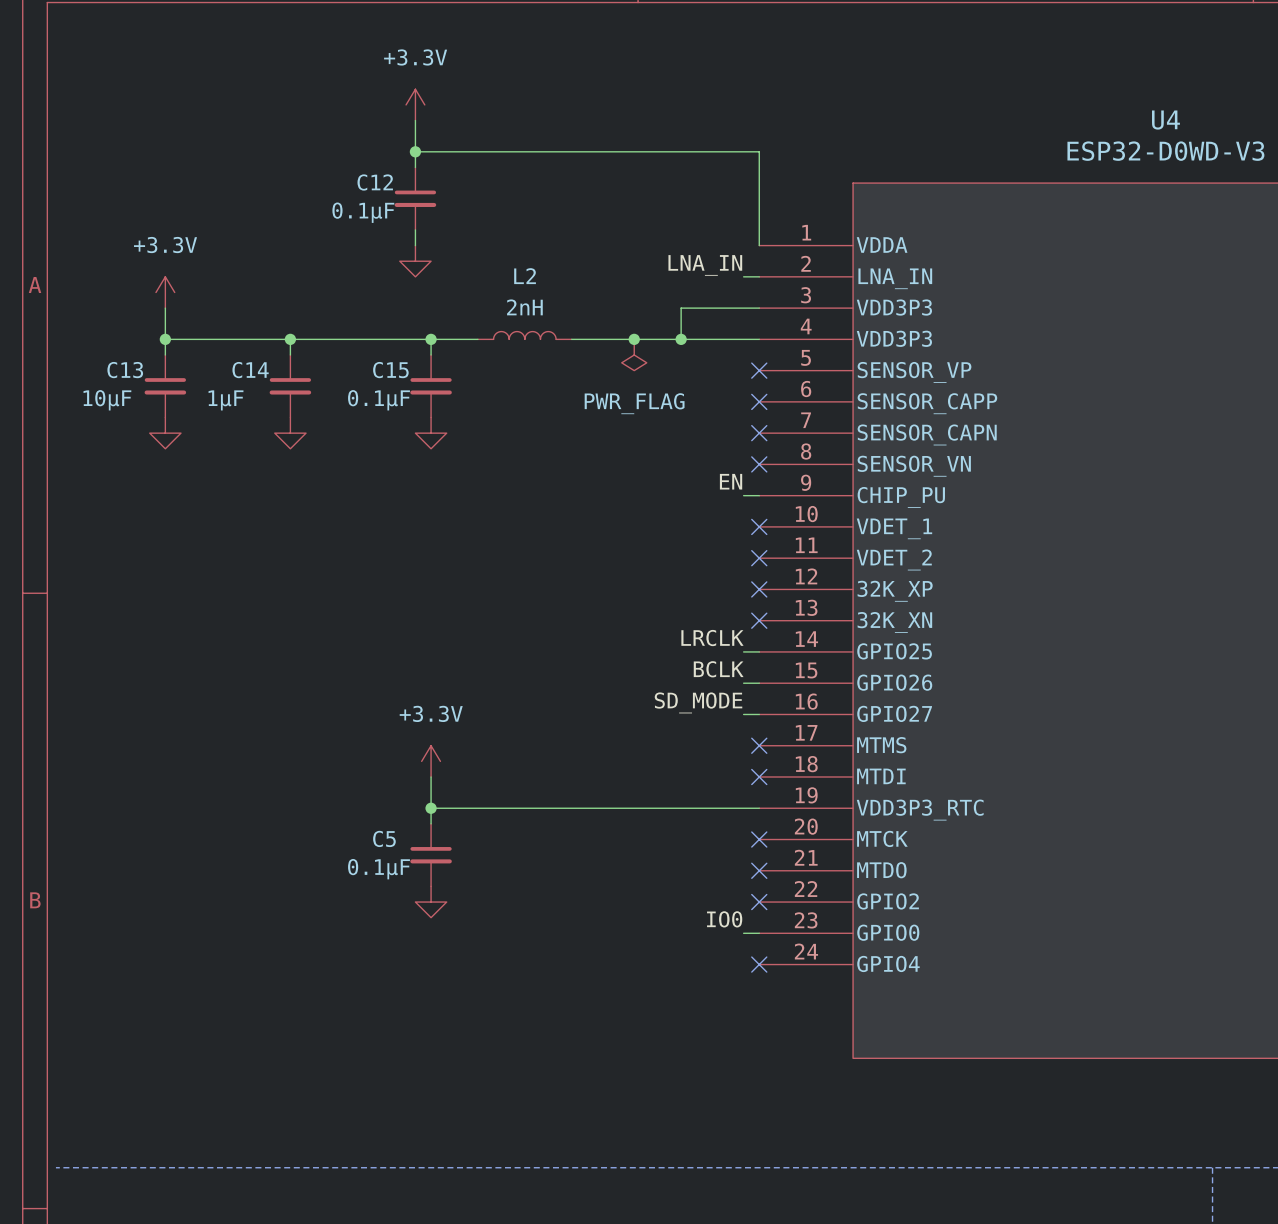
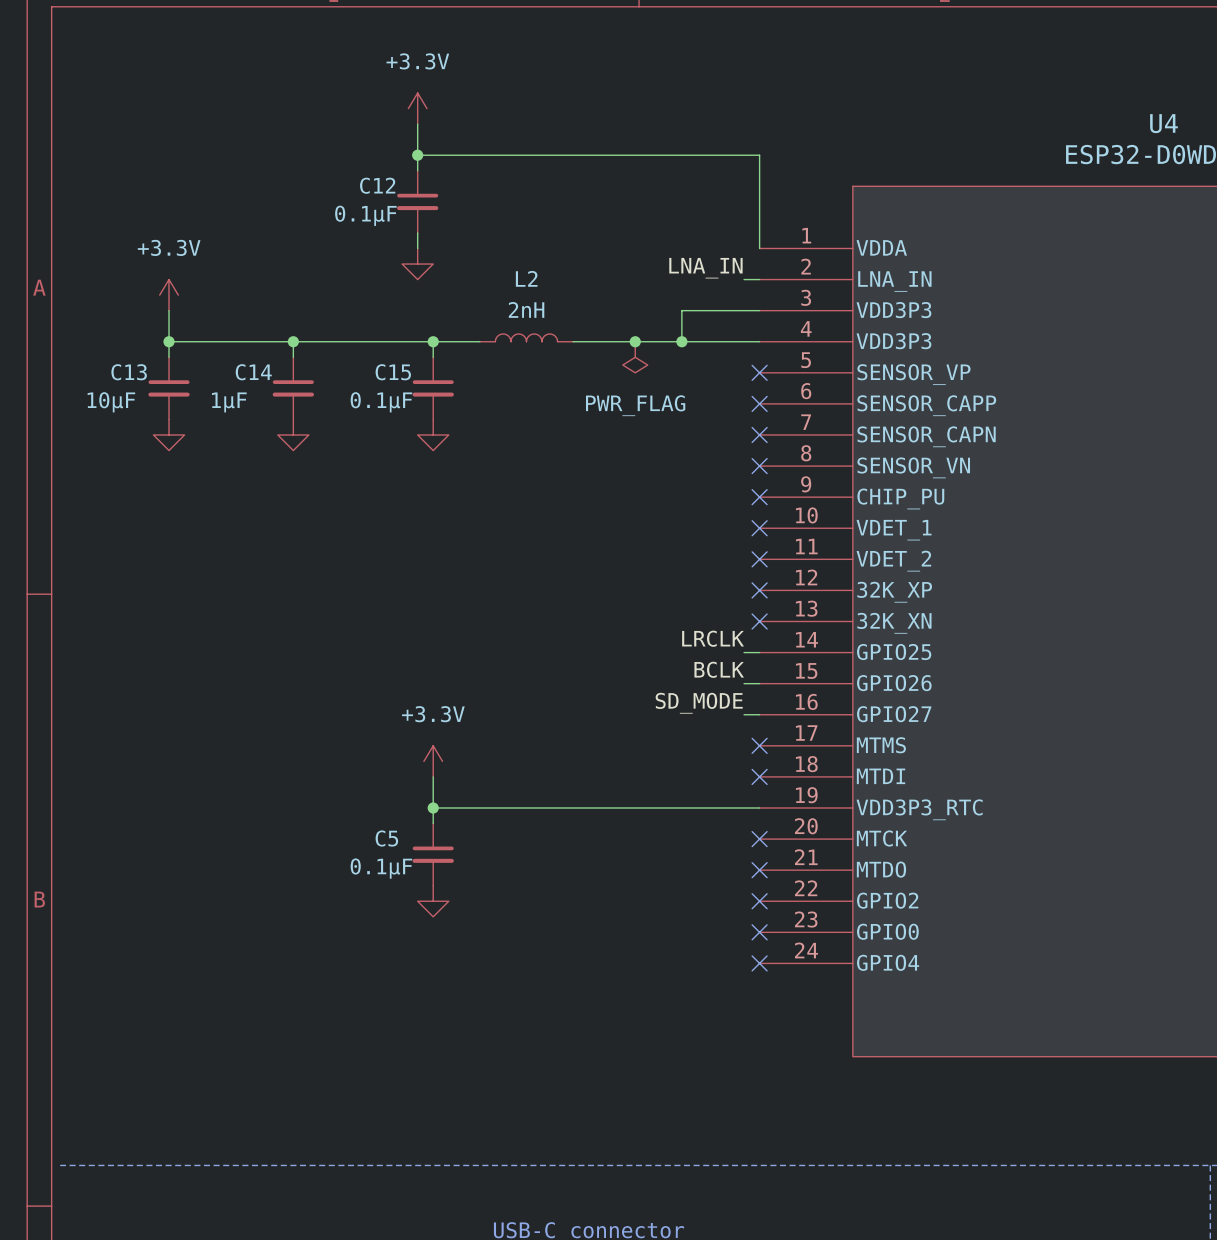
label: EN (731, 481) -> none
wire: (743, 495) (759, 495) -> none
no-connect mark: none -> (759, 497)
label: IO0 (724, 919) -> none
wire: (743, 933) (759, 933) -> none
no-connect mark: none -> (759, 932)

